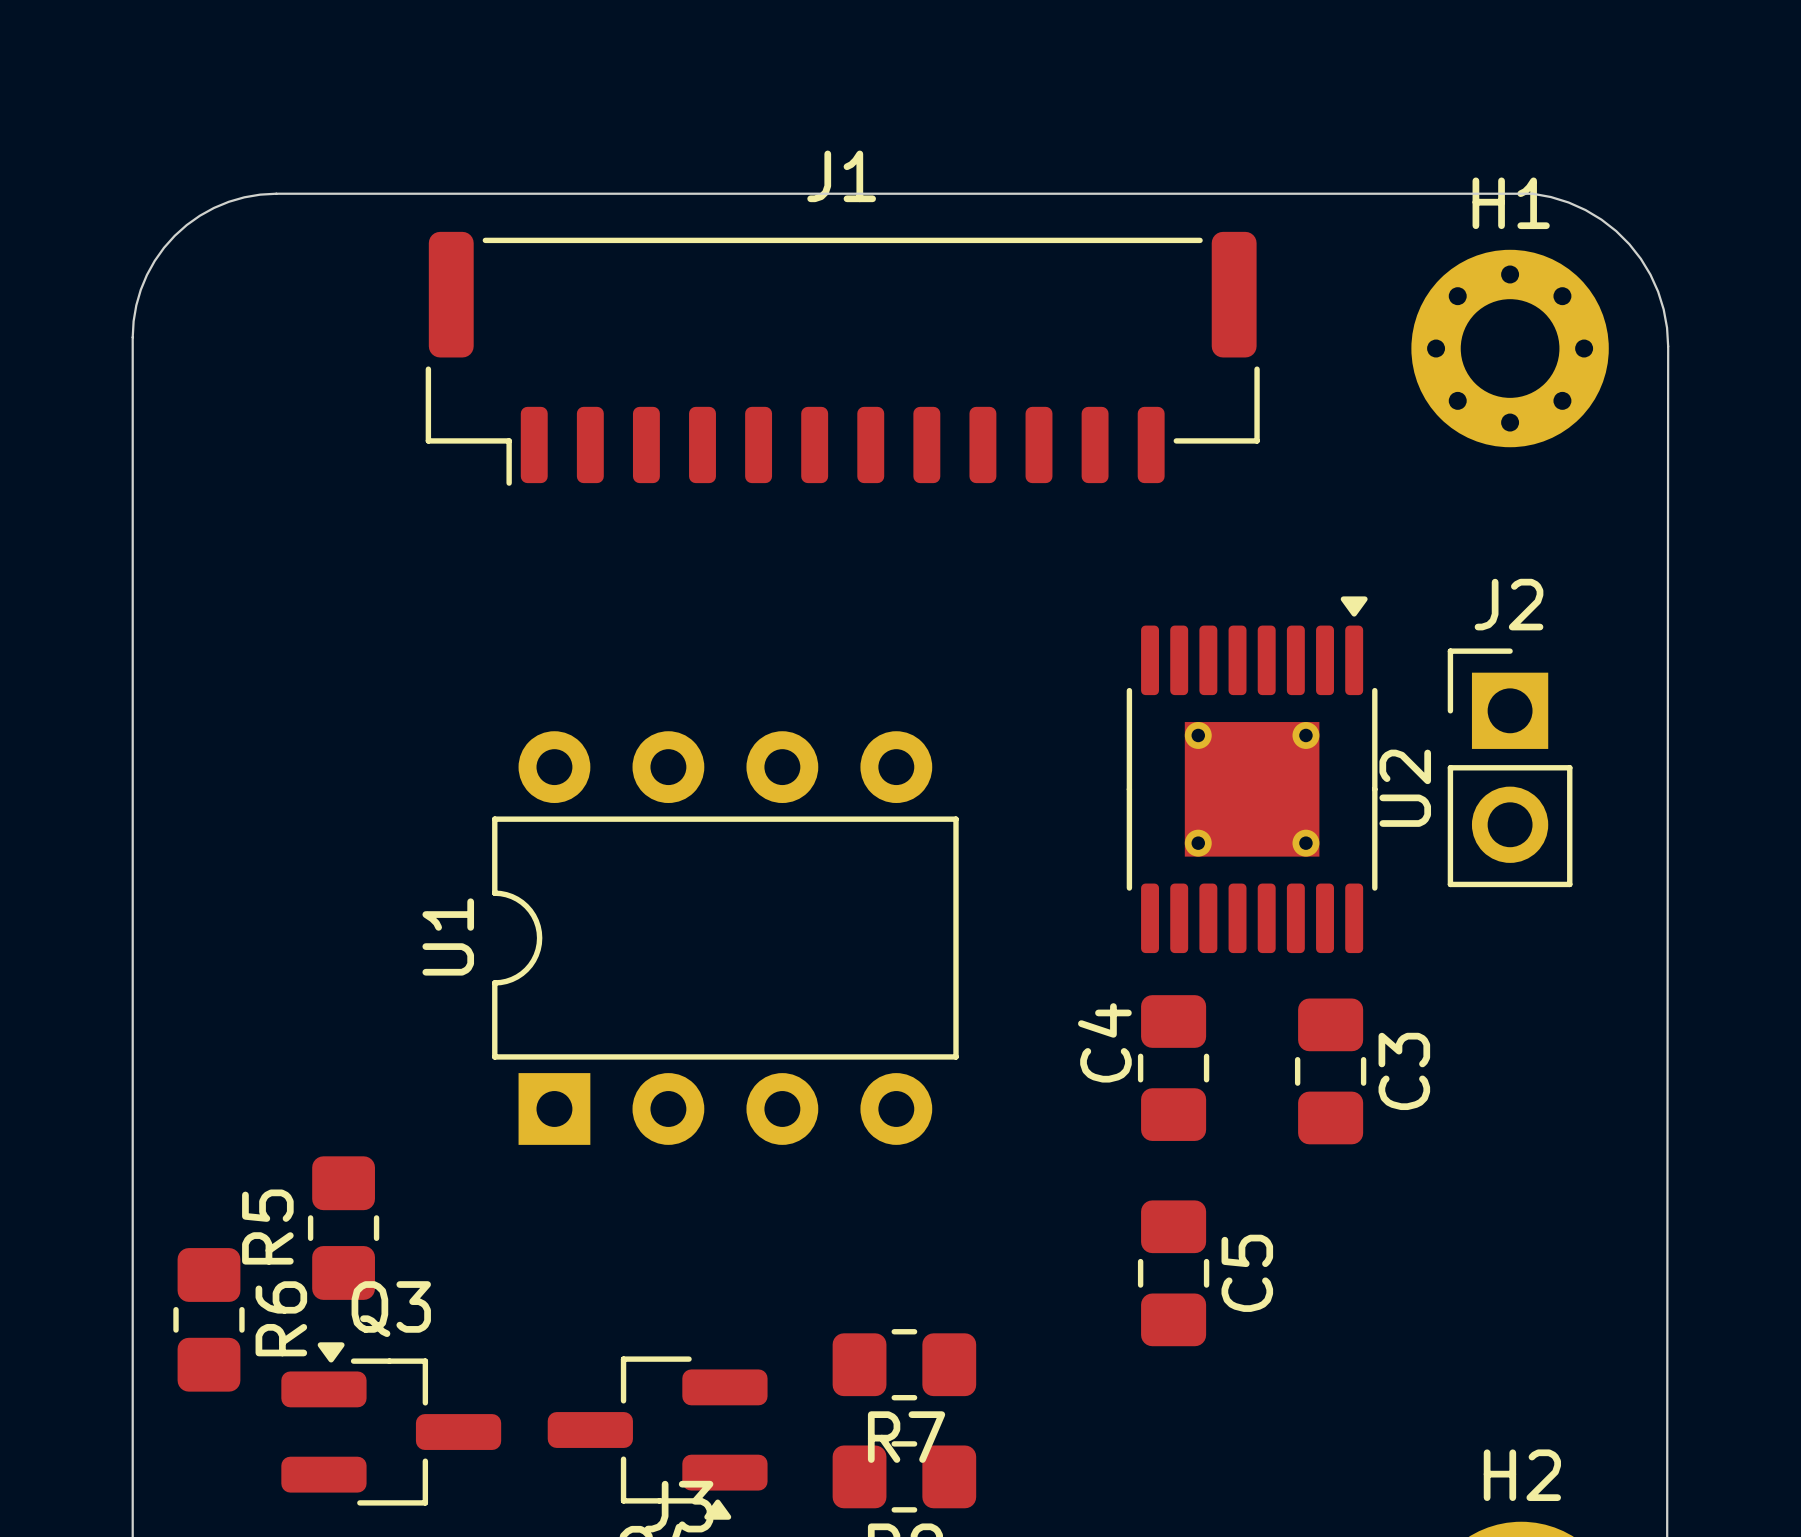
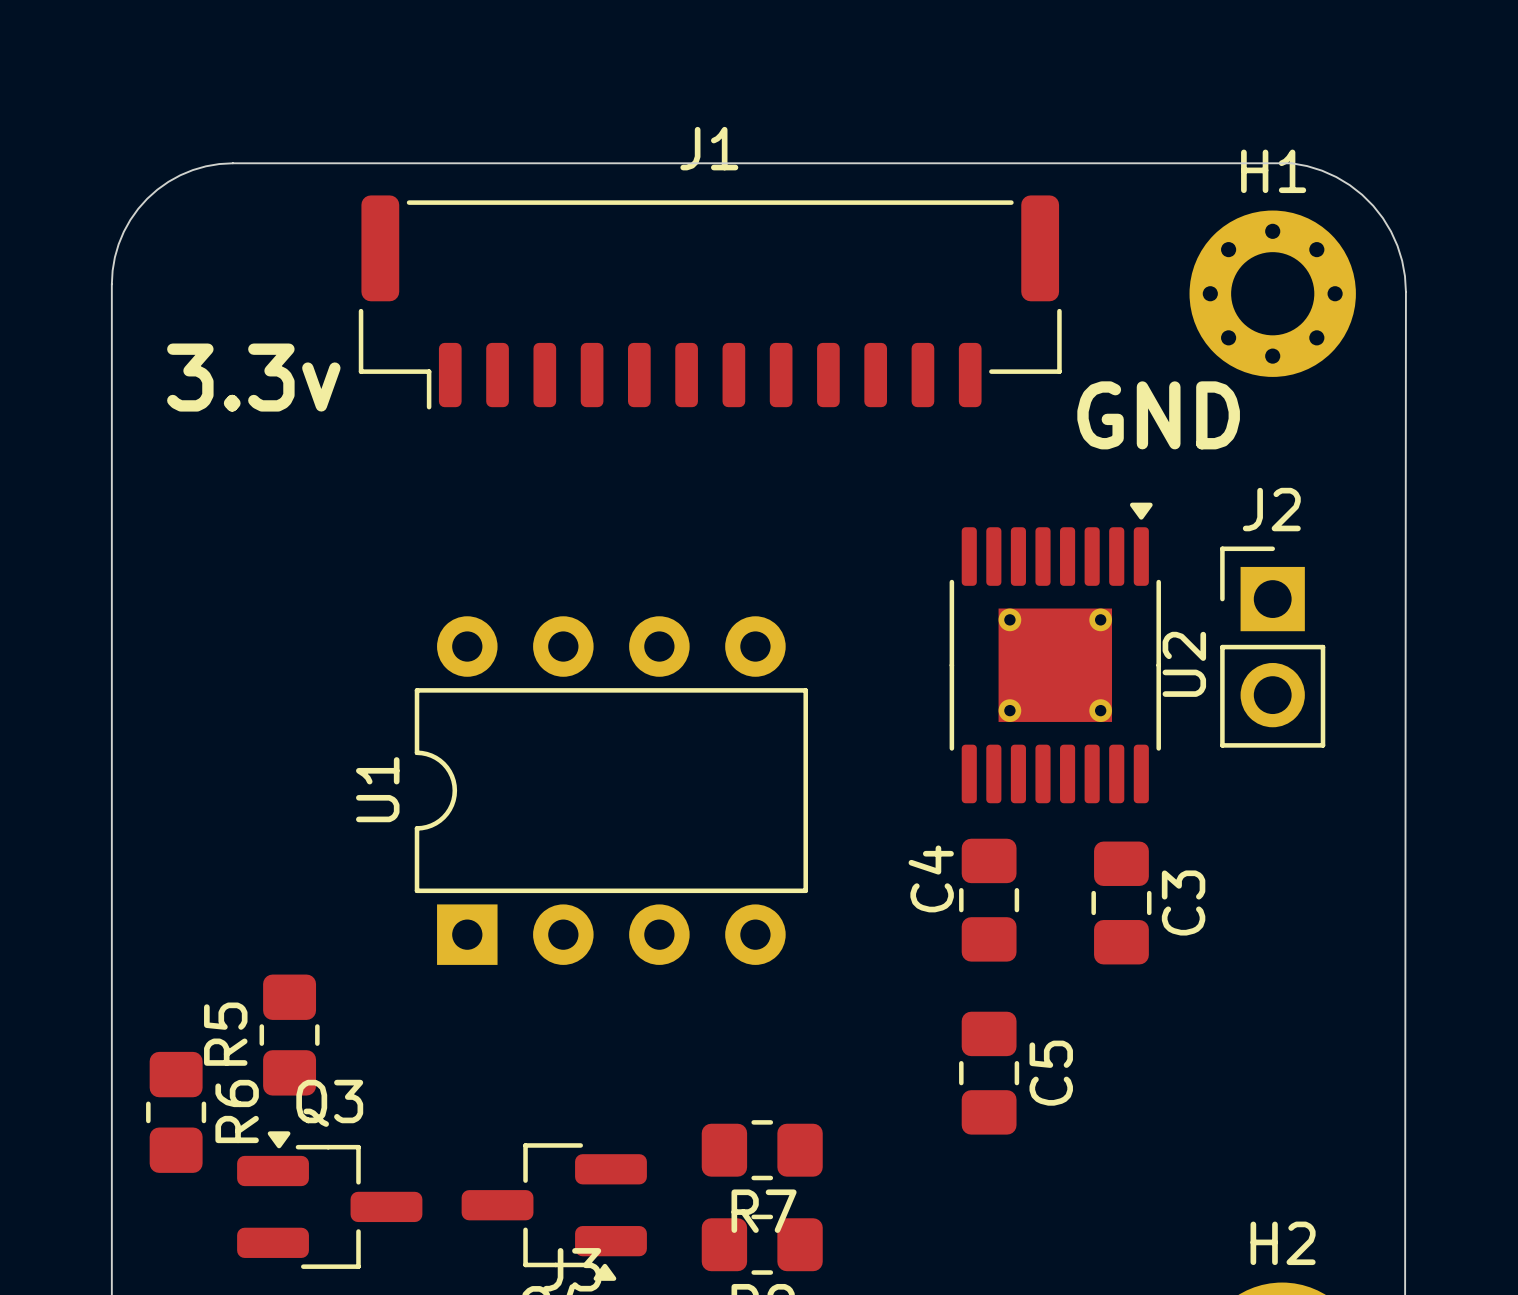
text: none -> 3.3v (253, 377)
text: none -> GND (1158, 415)

